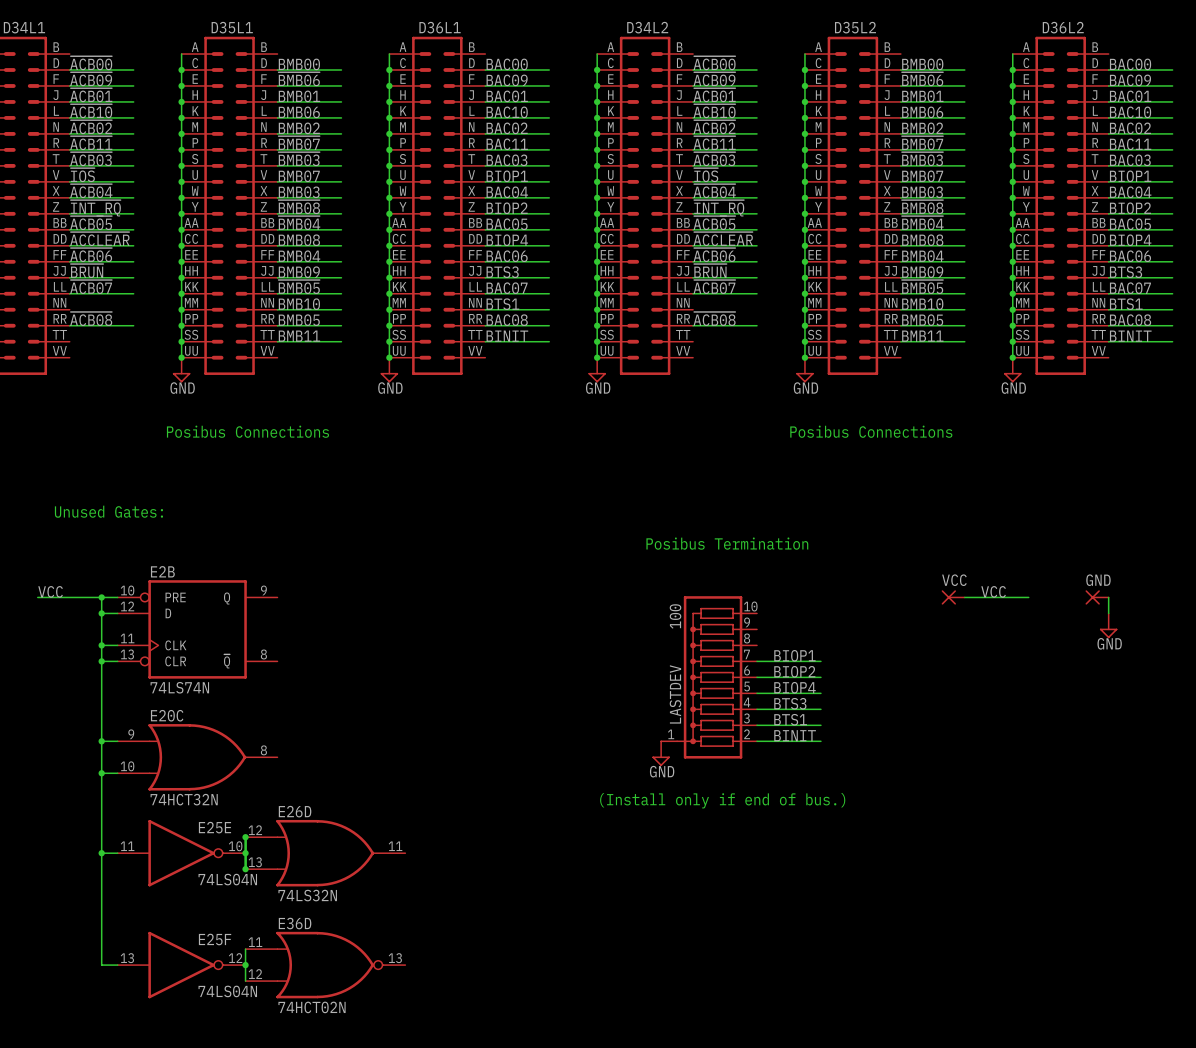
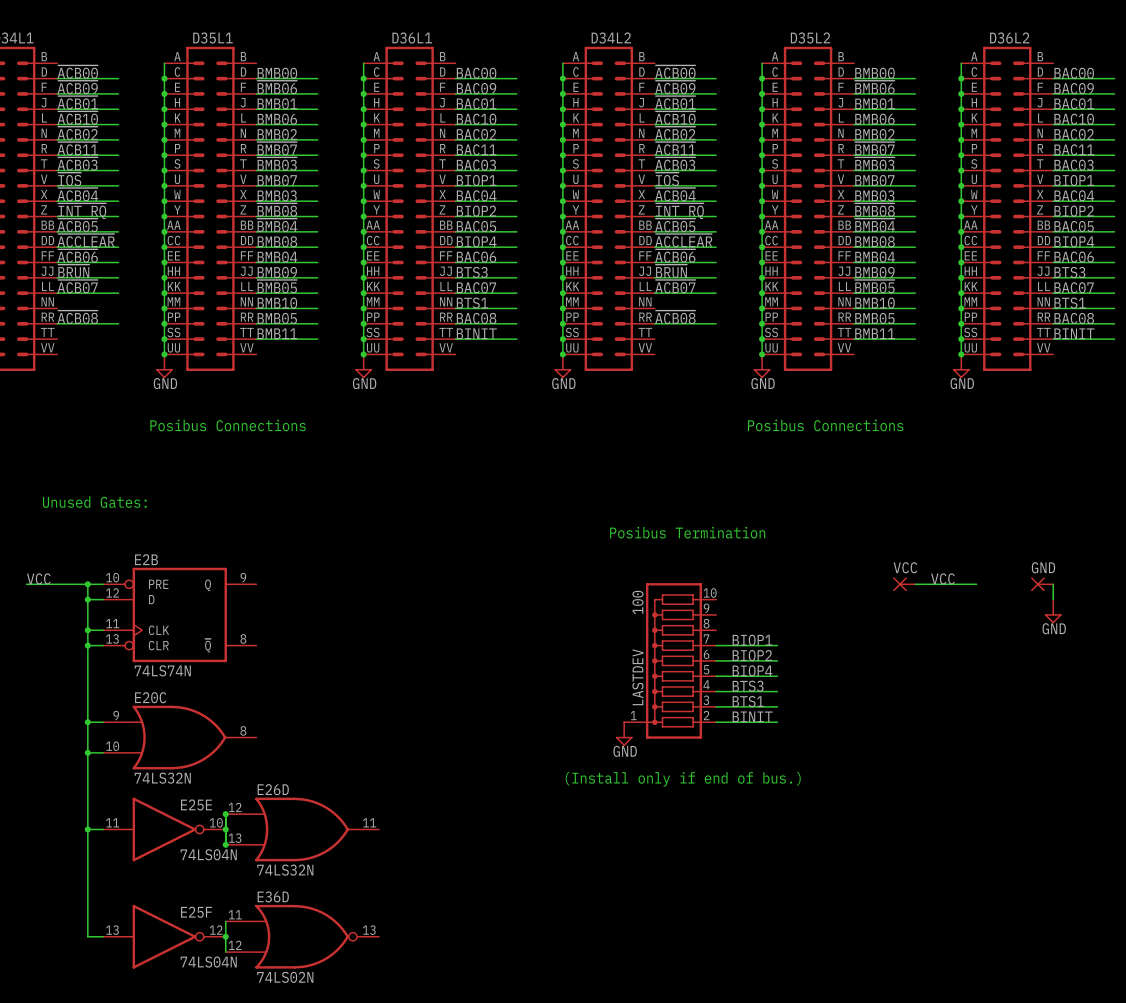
E20C value: 74HCT32N (184, 799) -> 74LS32N (162, 778)
E36D value: 74HCT02N (312, 1007) -> 74LS02N (285, 977)

